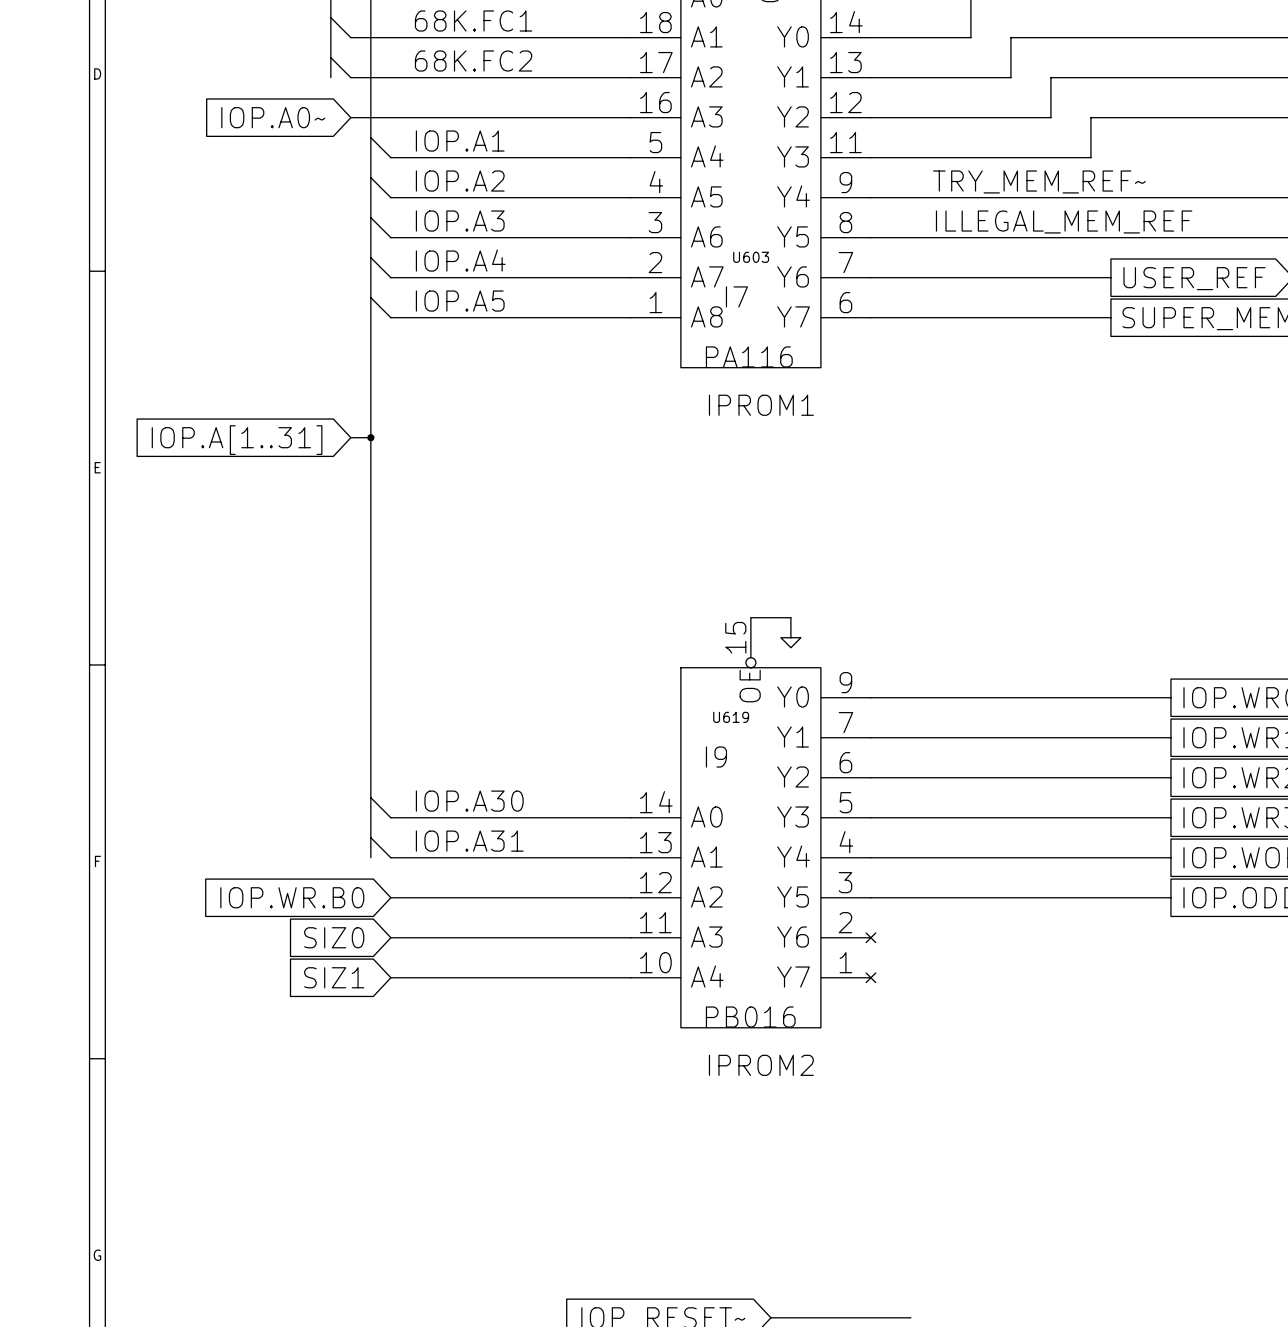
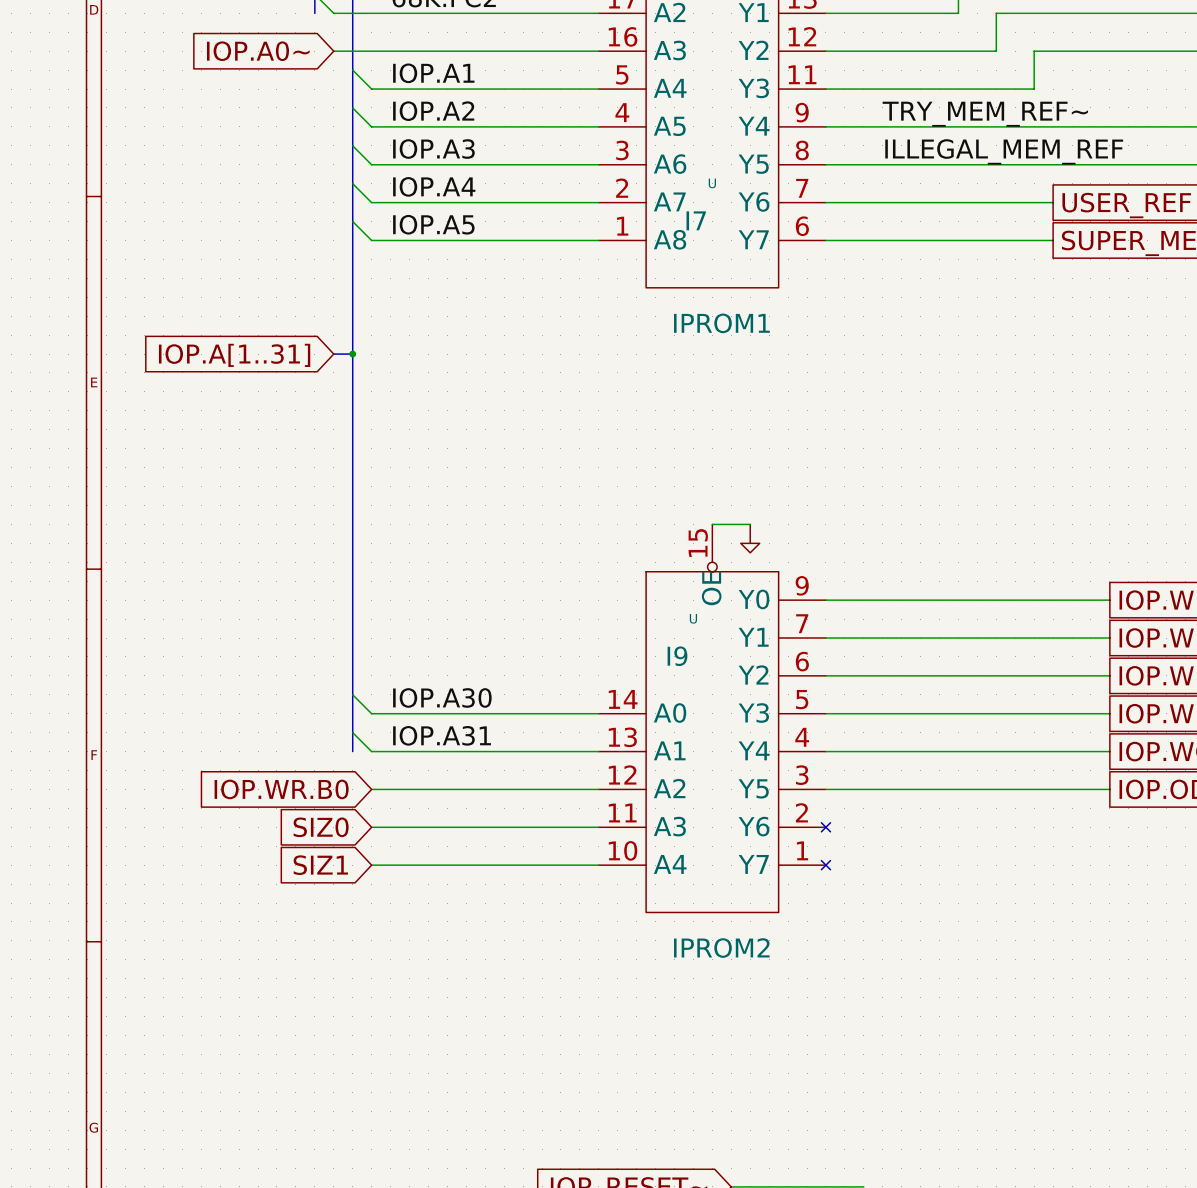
U603 name: U603 (751, 257) -> U (712, 183)
U603 value: PA116 (749, 356) -> none
U619 name: U619 (731, 717) -> U (693, 618)
U619 value: PB016 (750, 1017) -> none

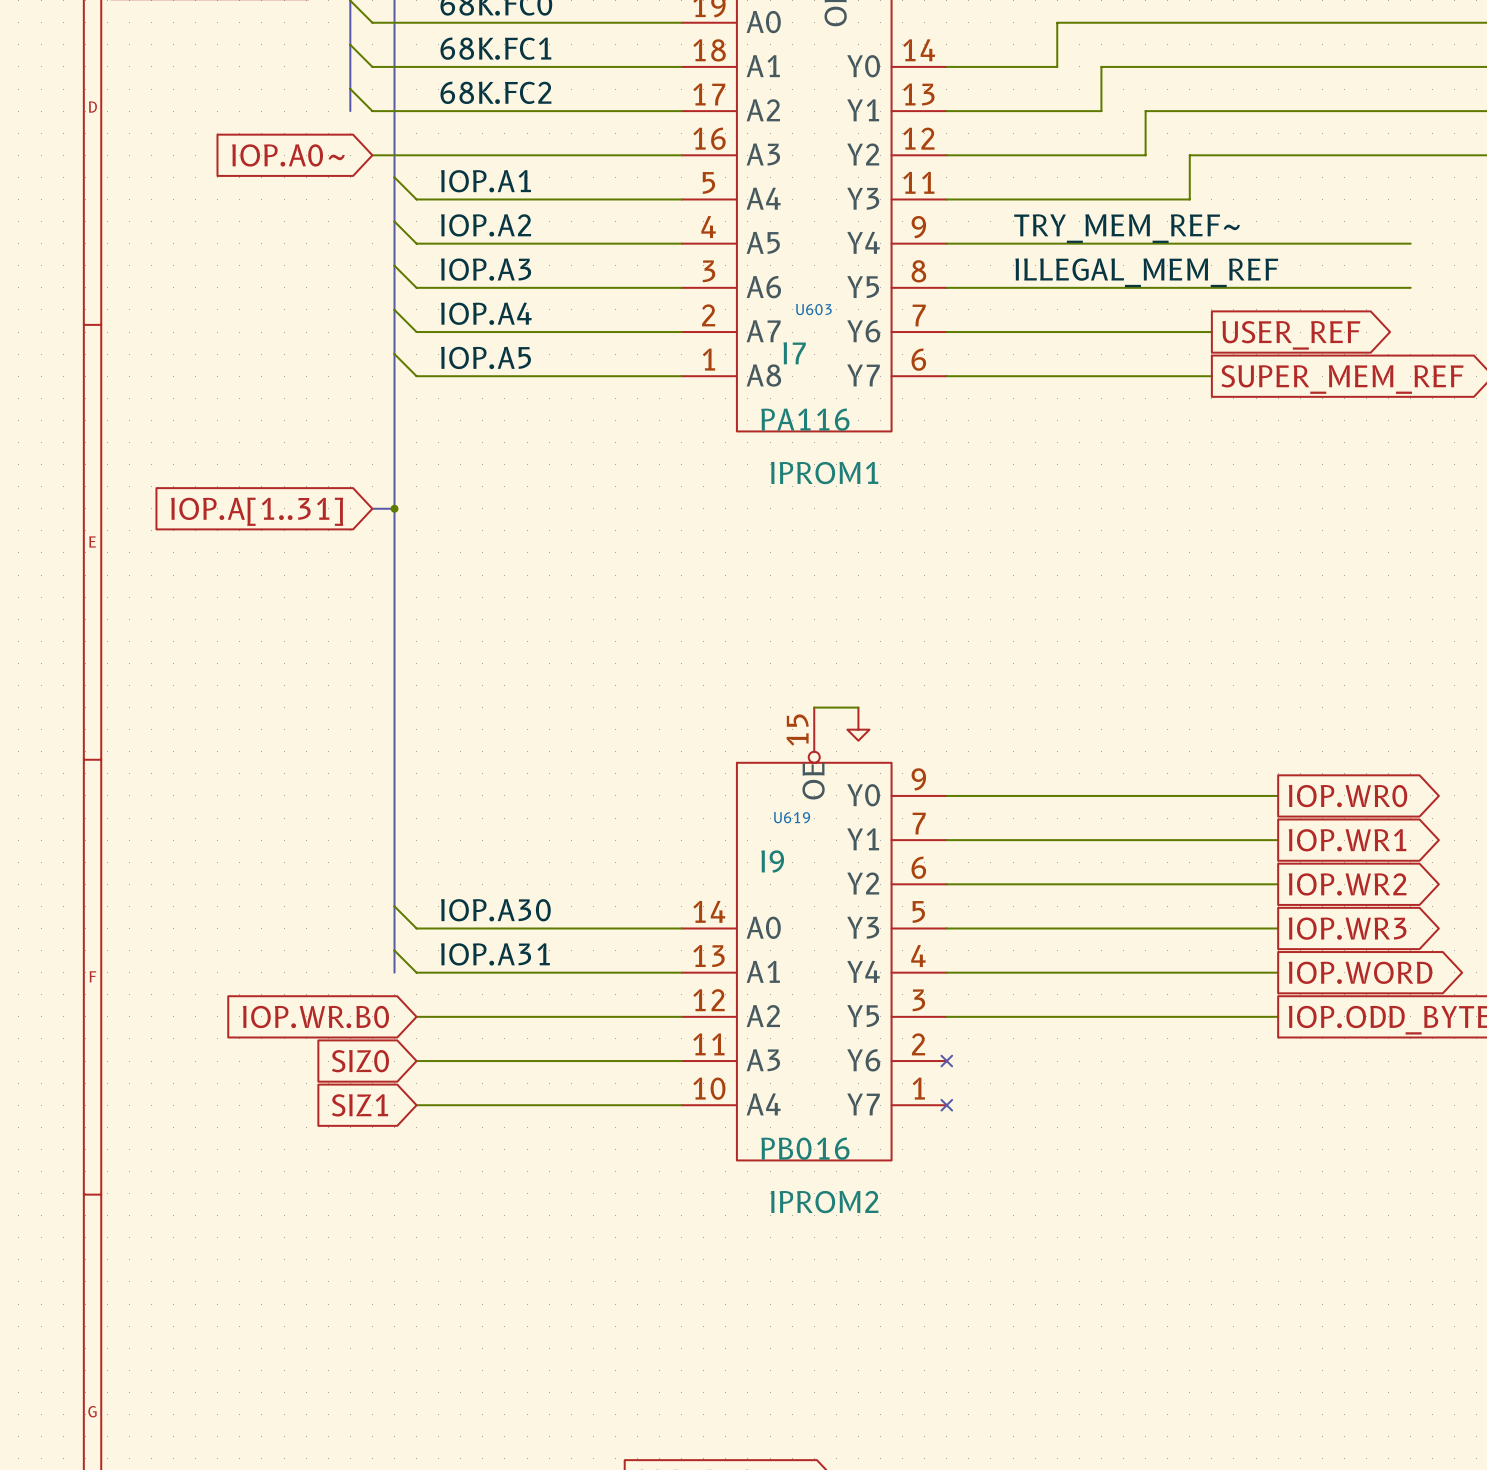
U name: U (712, 183) -> U603 (813, 309)
U value: none -> PA116 (805, 419)
U name: U (693, 618) -> U619 (792, 817)
U value: none -> PB016 (805, 1148)

